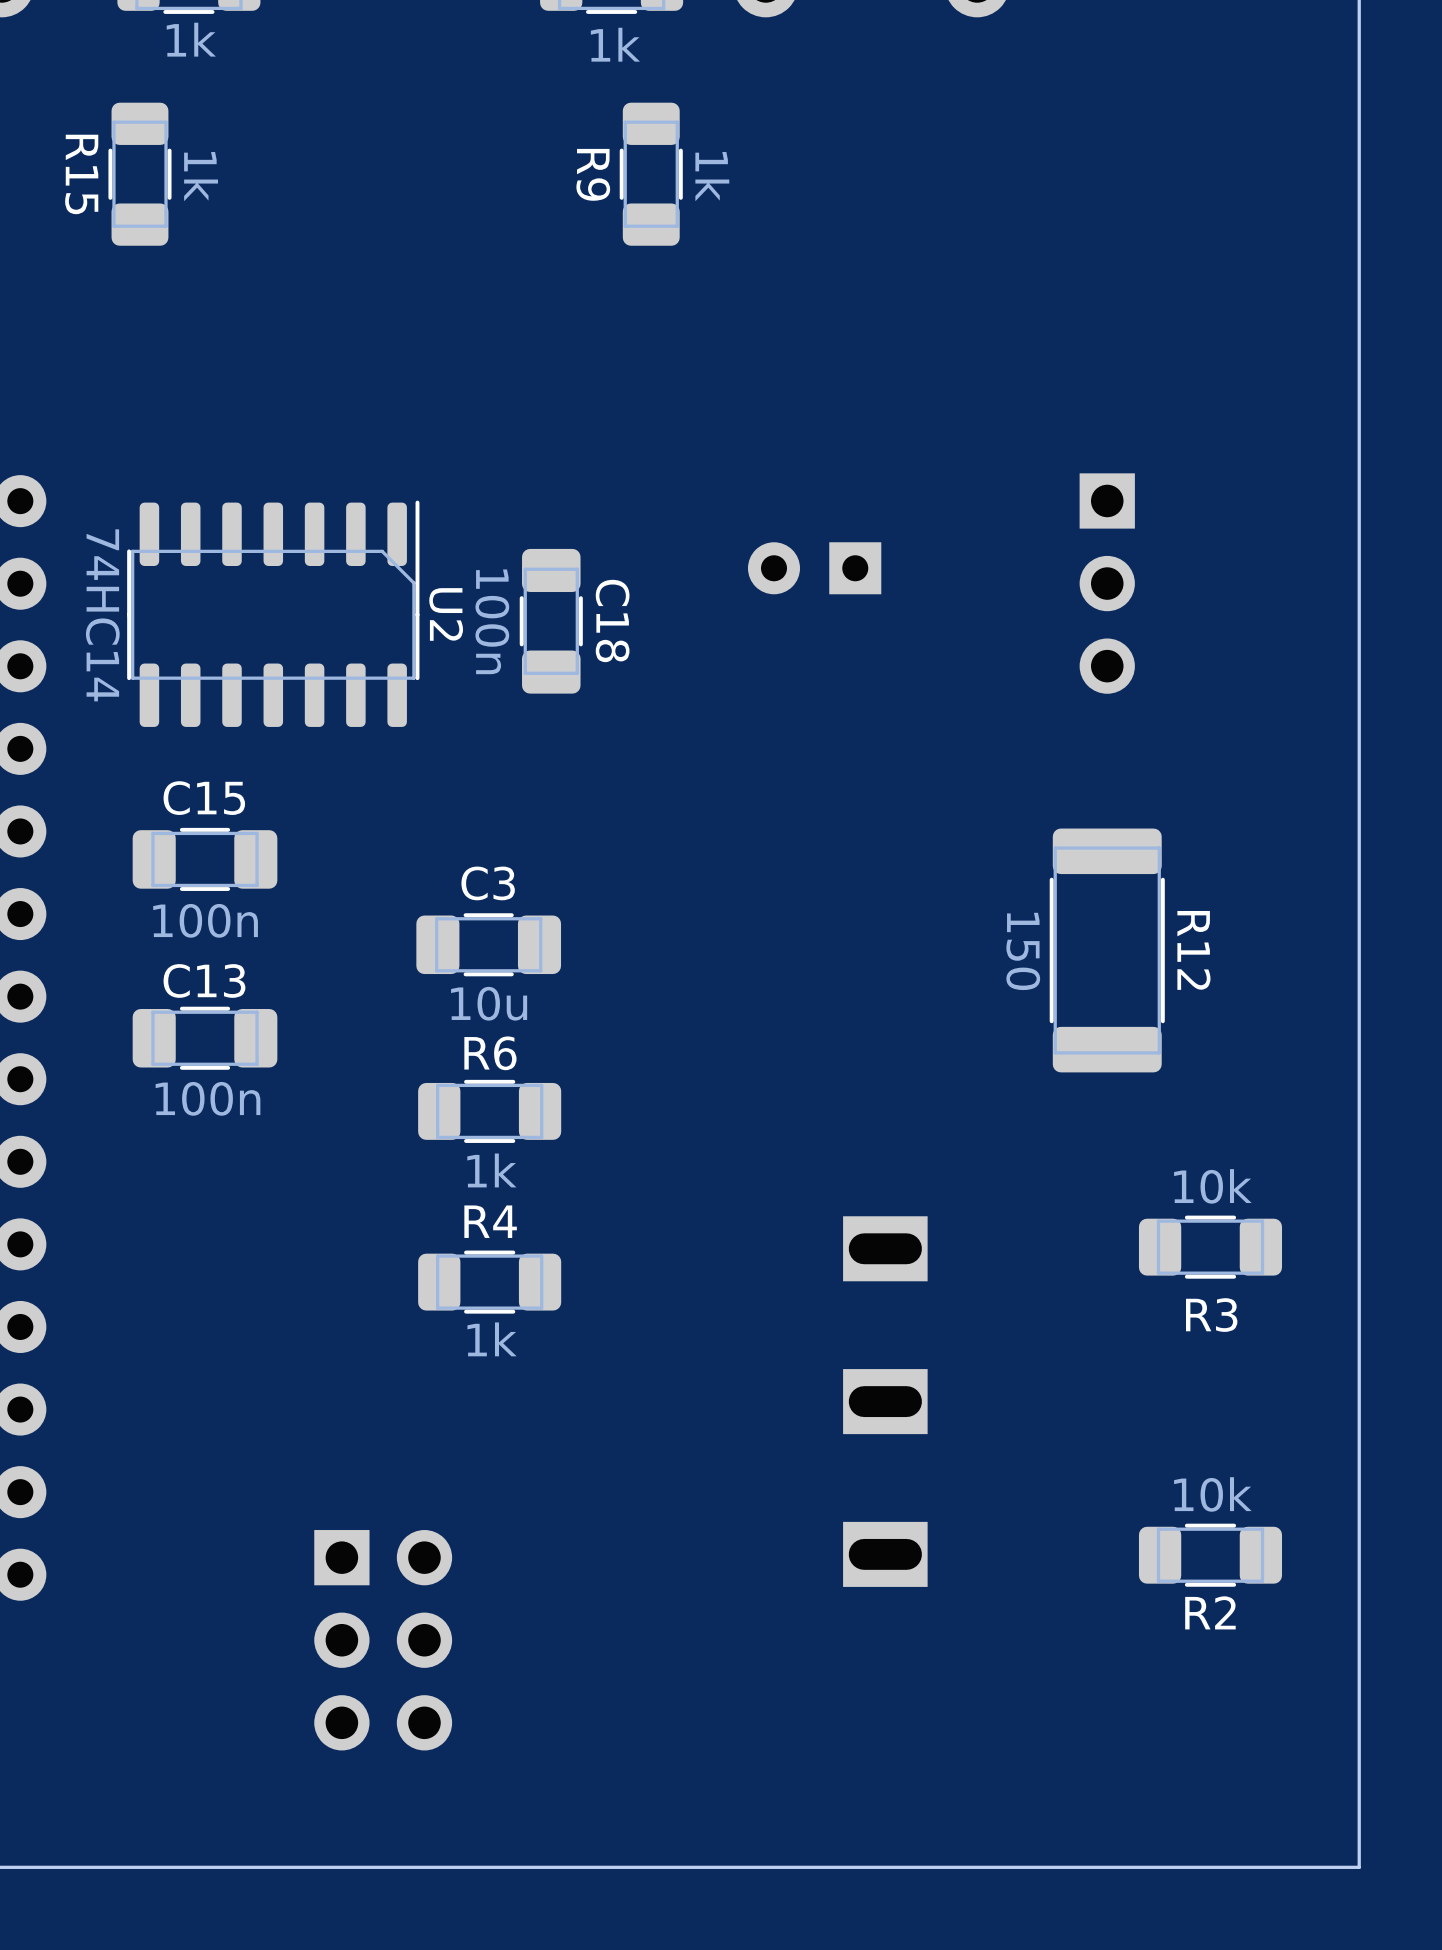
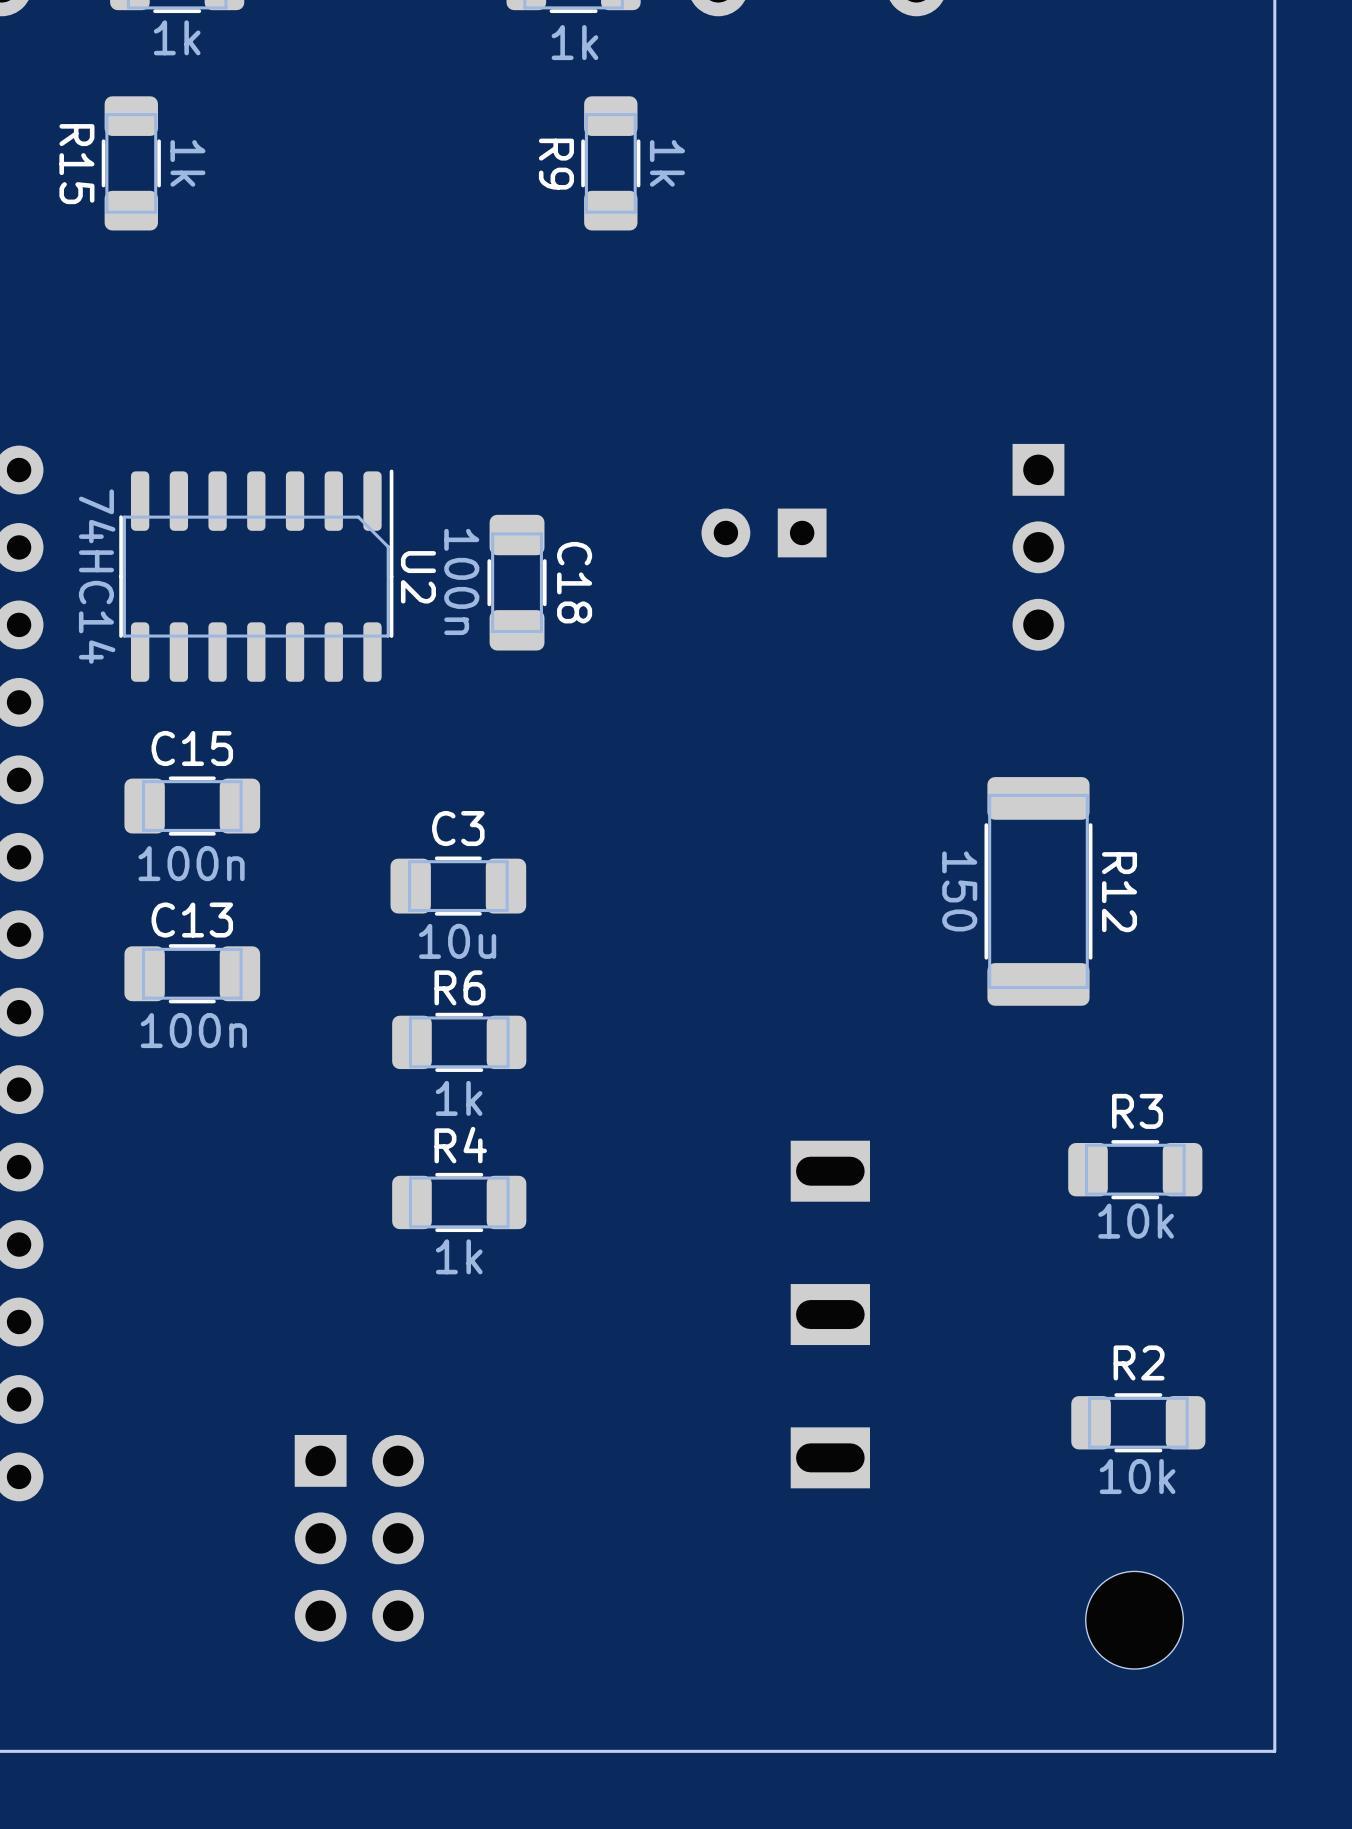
R3 value position: 10k (1212, 1186) -> 10k (1136, 1221)
R3 name position: R3 (1211, 1315) -> R3 (1137, 1111)
R2 value position: 10k (1212, 1494) -> 10k (1137, 1476)
R2 position: (1210, 1555) -> (1138, 1422)
R2 name position: R2 (1210, 1612) -> R2 (1139, 1362)
part: none -> (1134, 1620)

